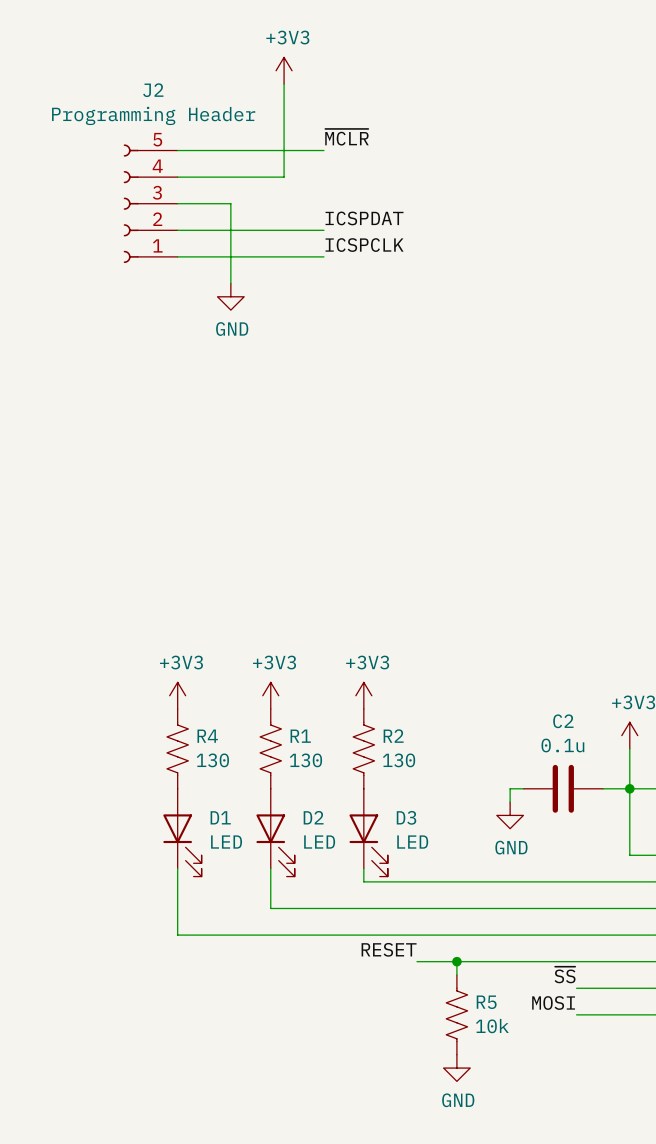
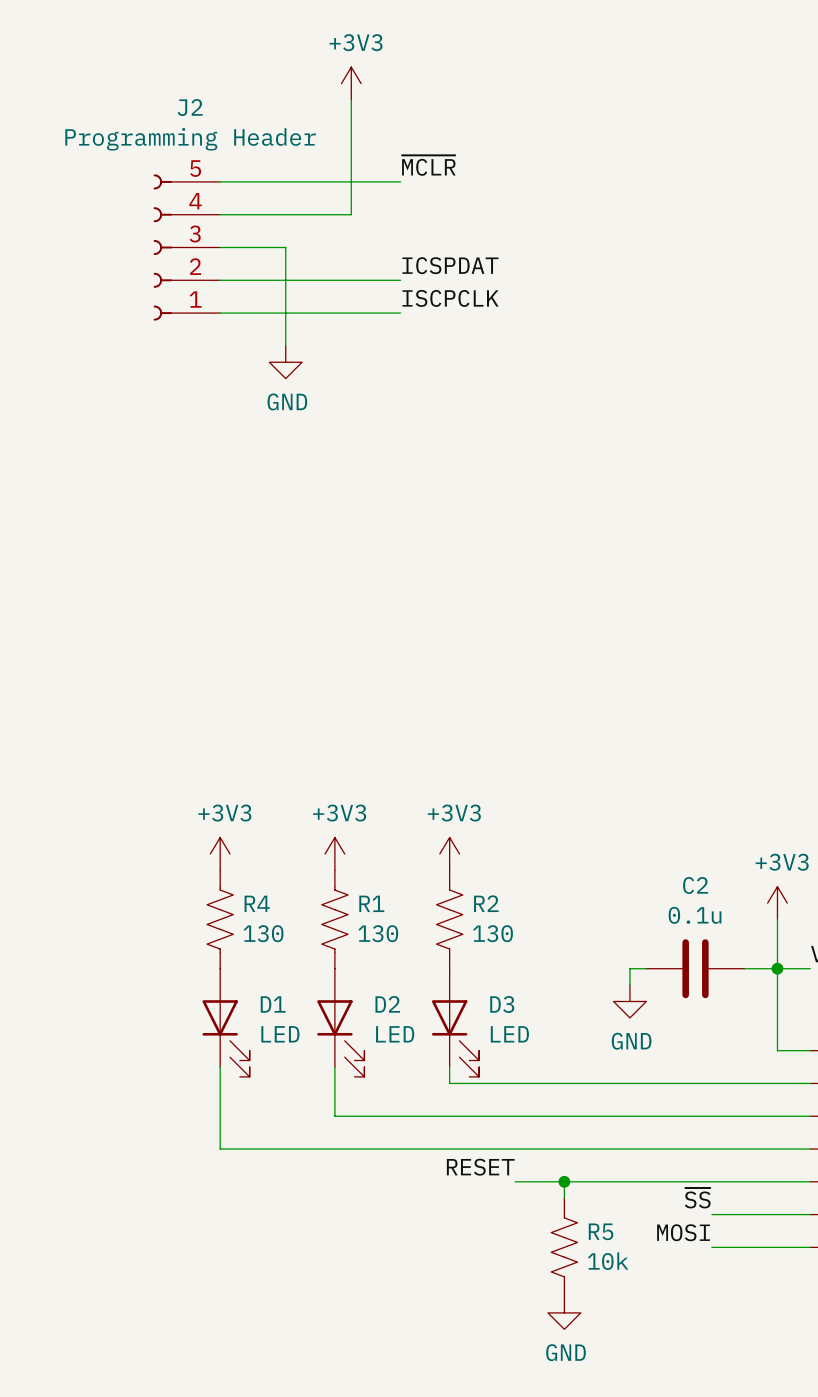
label: ICSPCLK (364, 245) -> ISCPCLK (450, 298)

